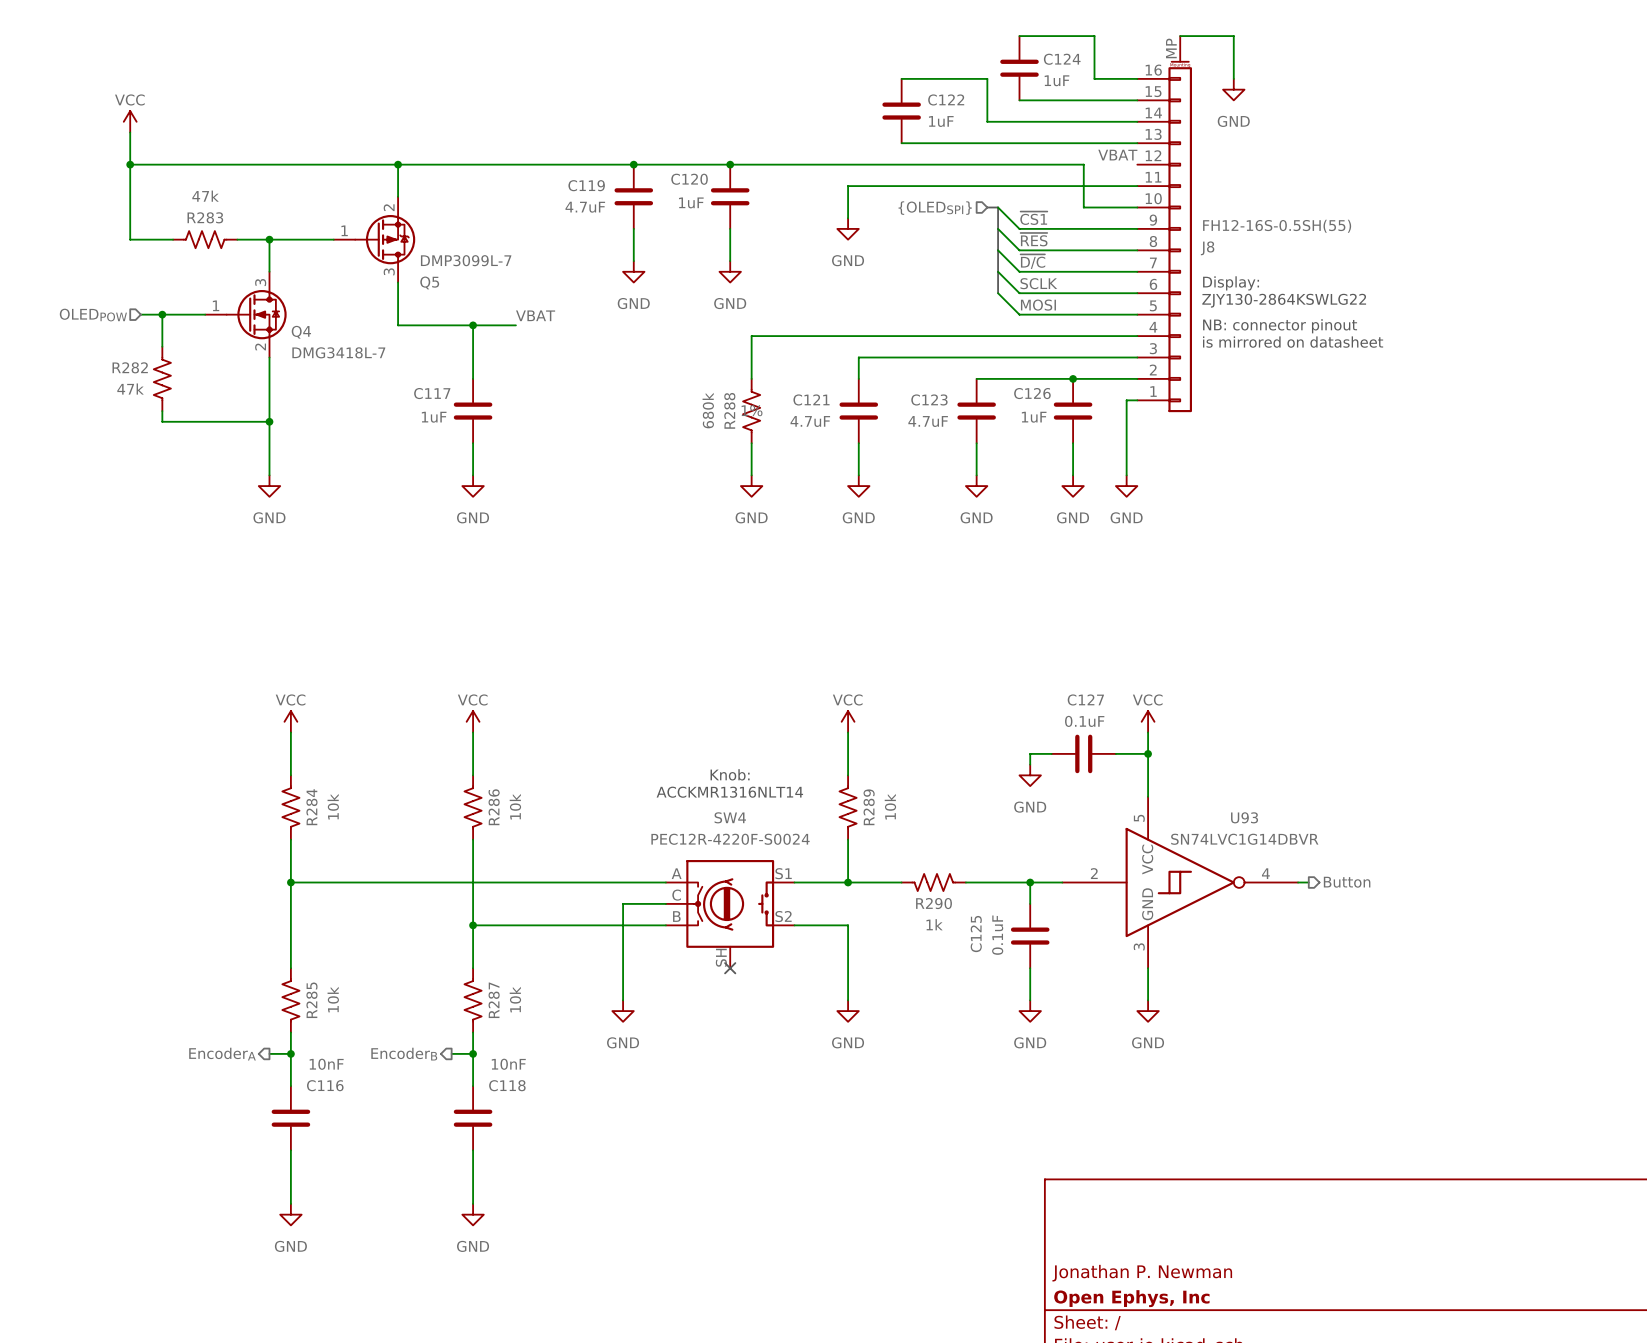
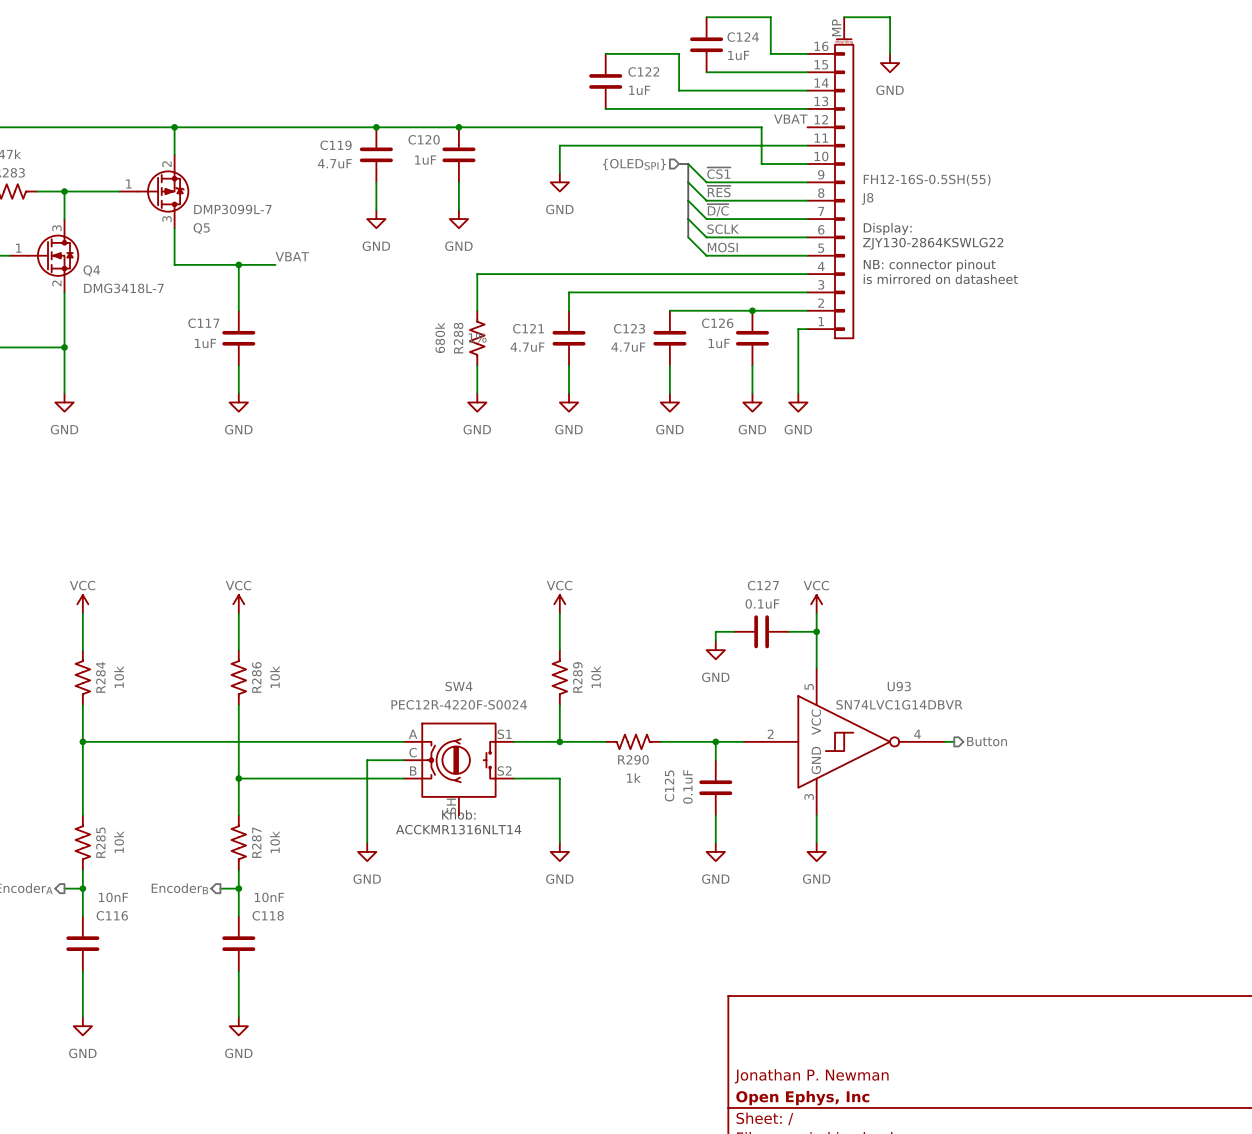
text position: Knob: (730, 774) -> Knob: (458, 814)
text position: ACCKMR1316NLT14 (729, 792) -> ACCKMR1316NLT14 (458, 829)
no-connect mark: (730, 968) -> none

